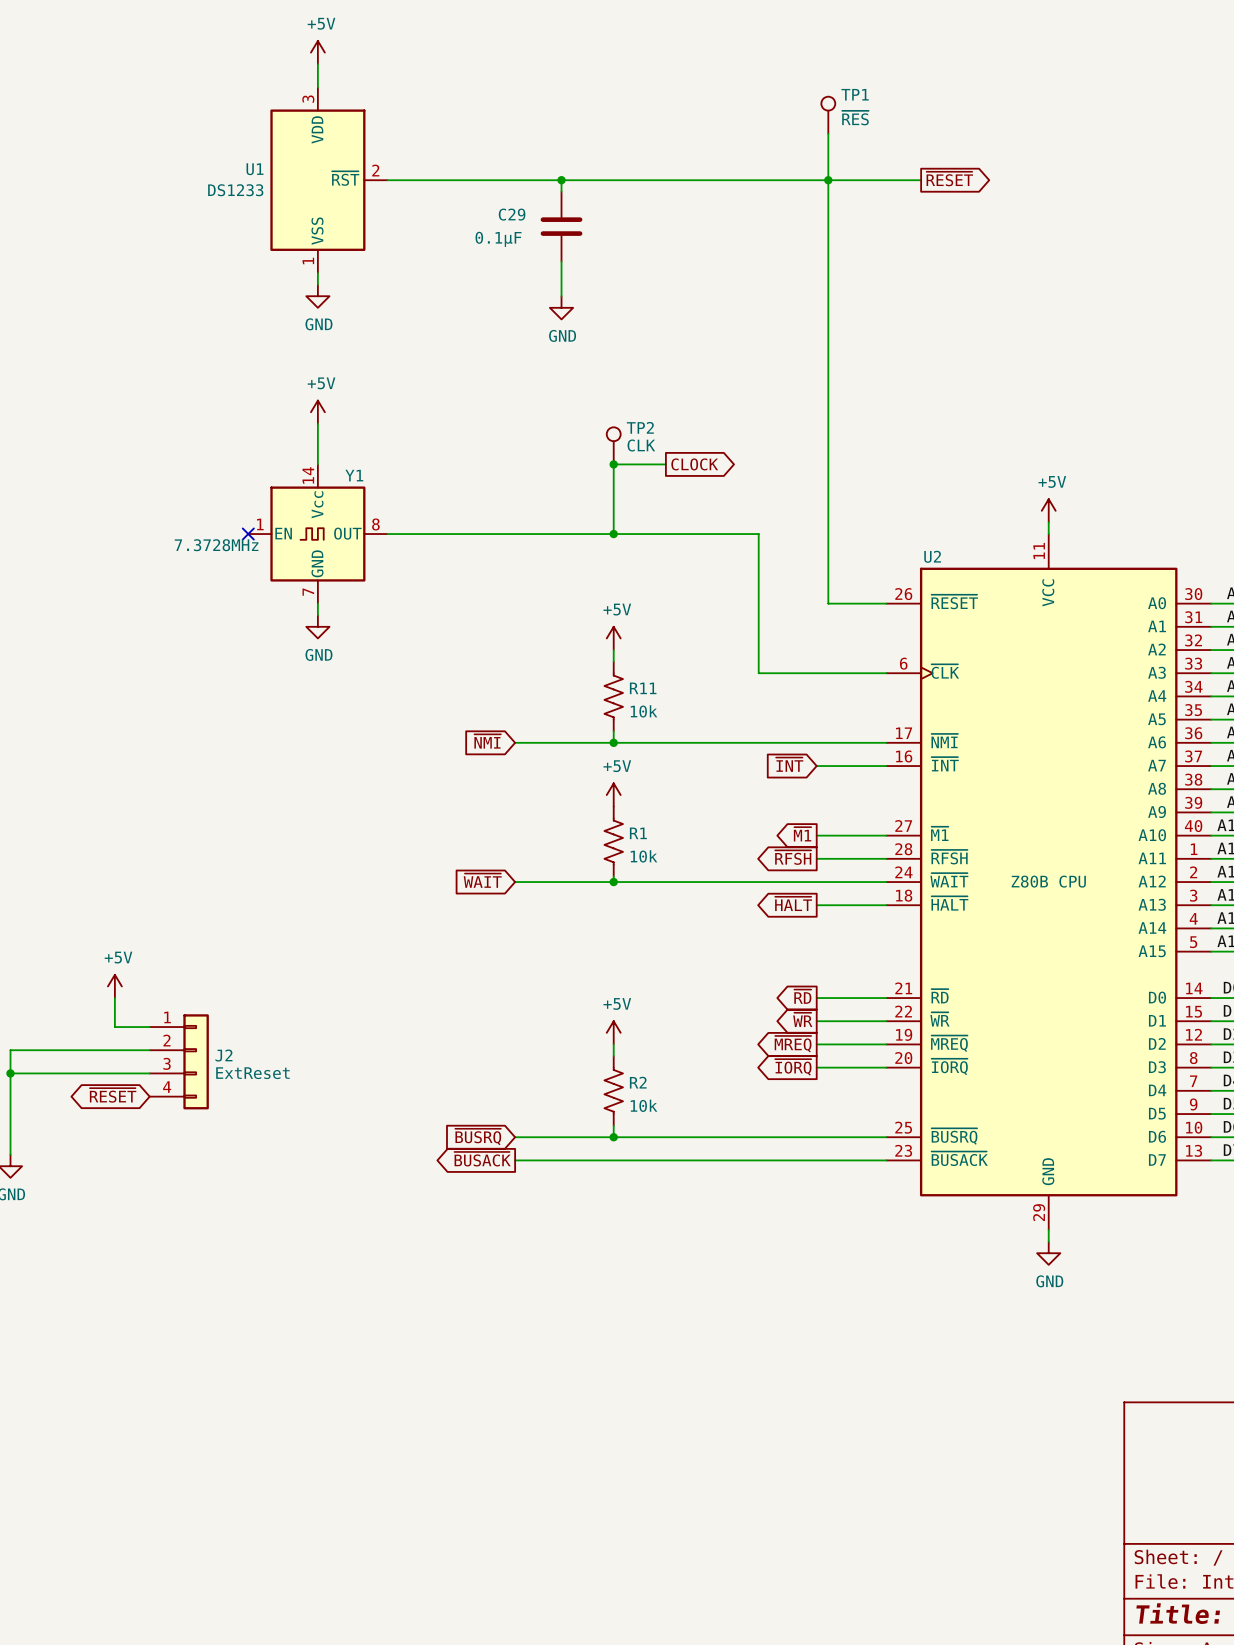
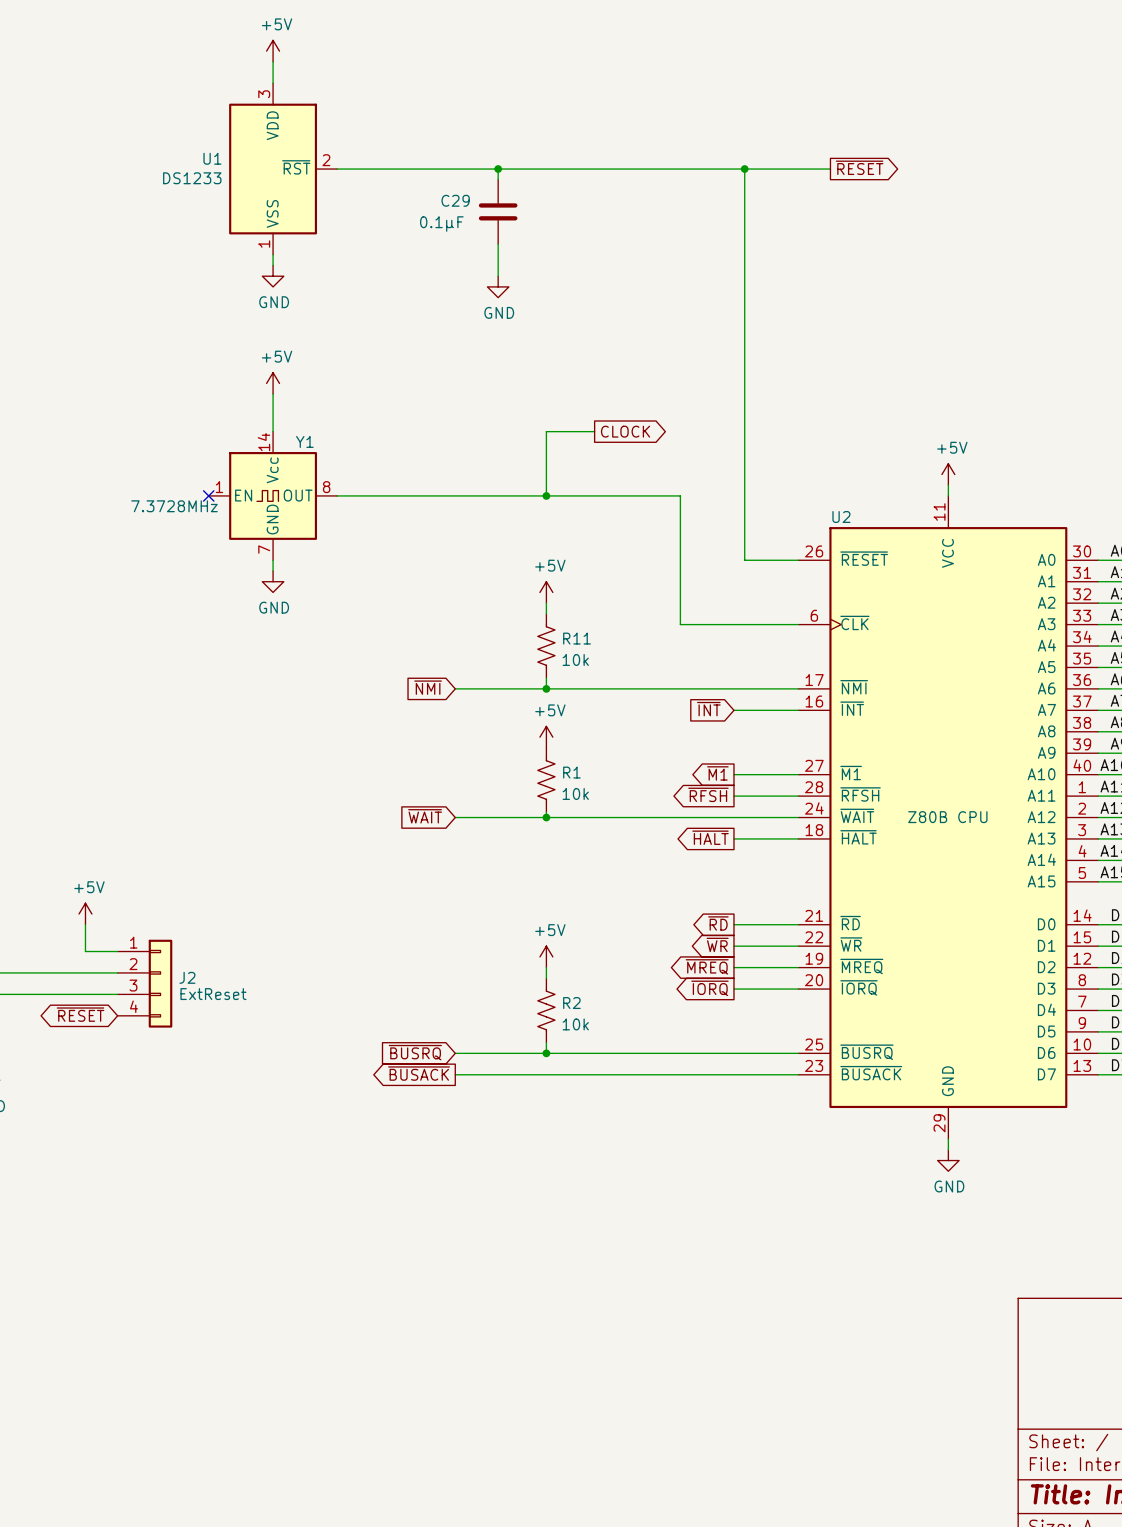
TP1: ~{RES} (828, 115) -> none
wire: (828, 133) (828, 180) -> none
TP2: CLK (613, 445) -> none
junction: (613, 464) -> none

